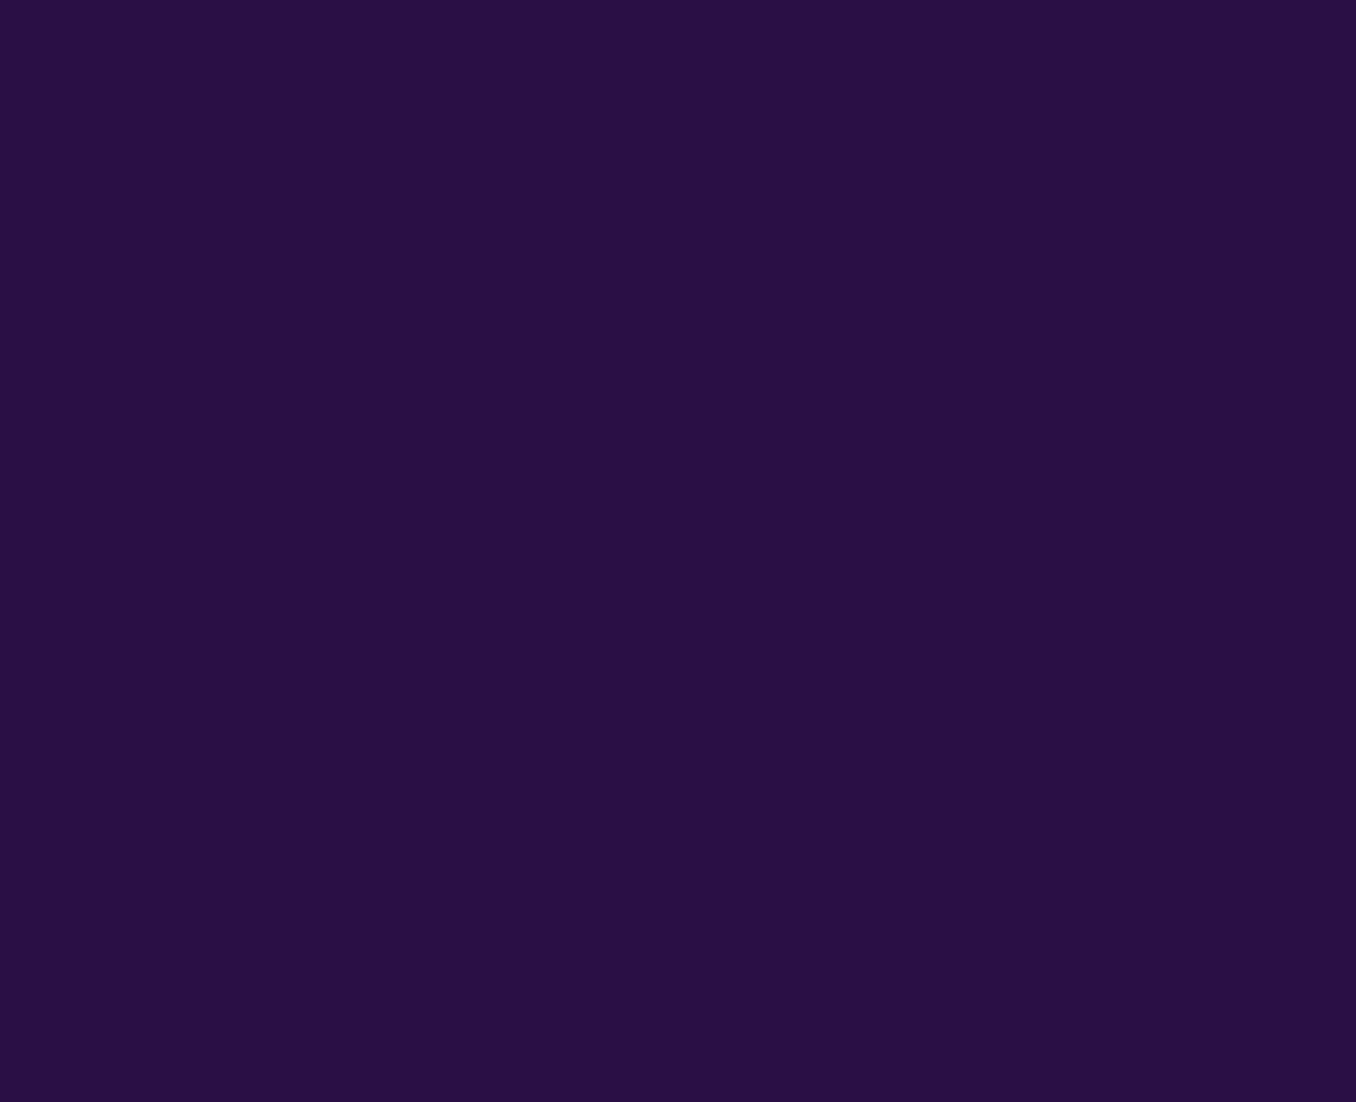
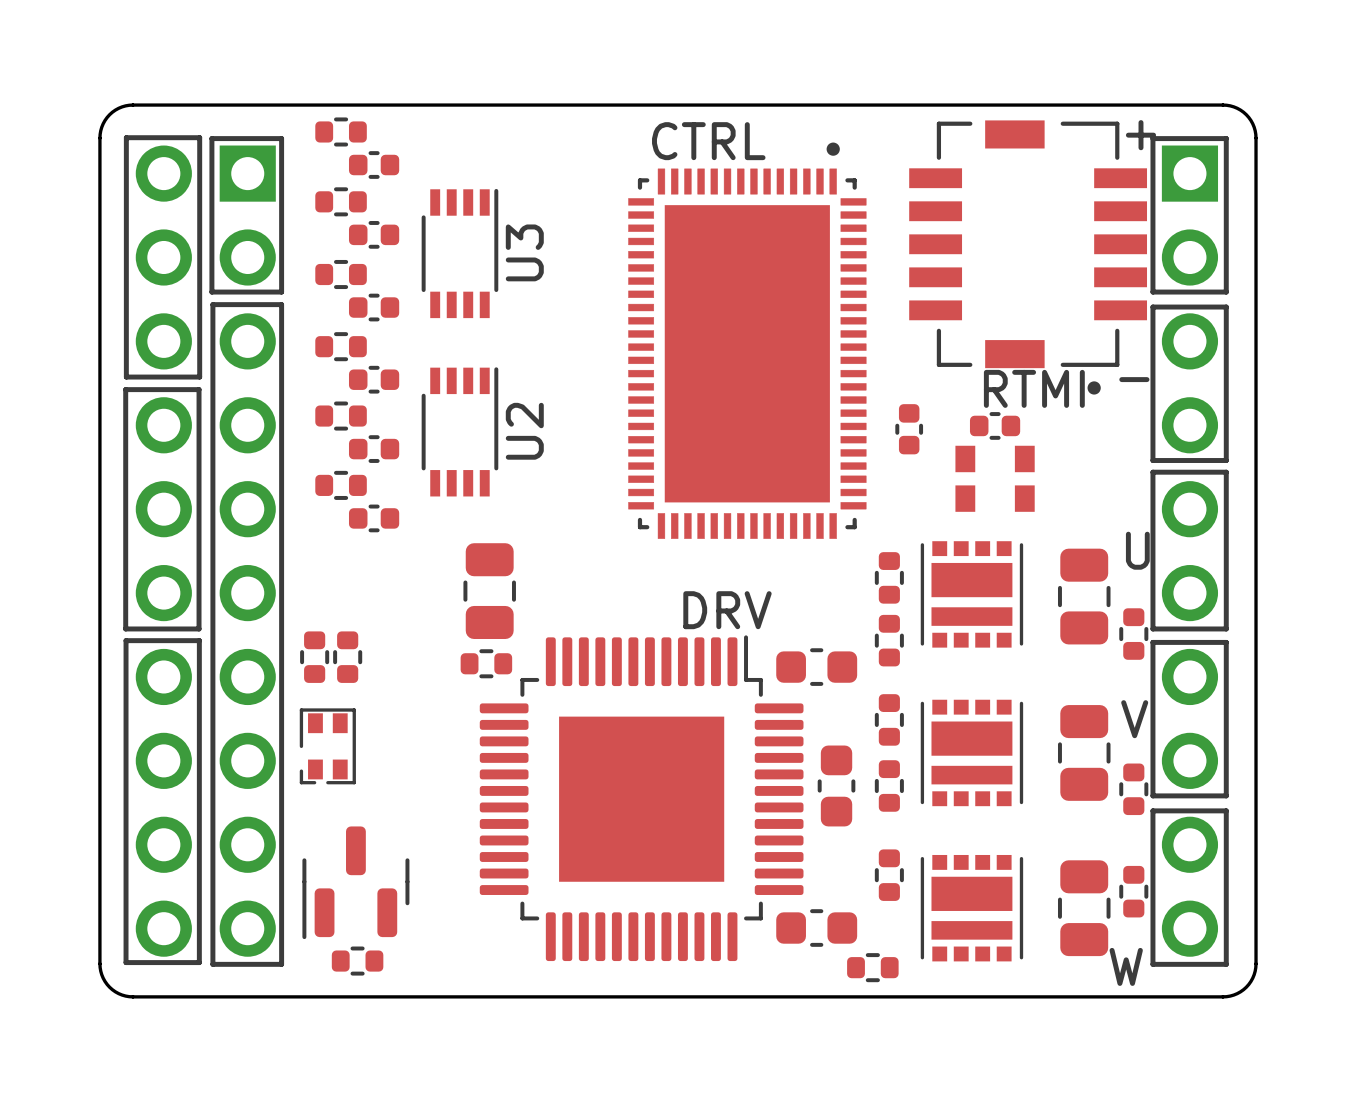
board edge: none -> (132, 105) (1222, 105) (1233, 106) (1243, 112) (1252, 123) (1256, 138) (1256, 963) (1254, 974) (1248, 984) (1237, 993) (1222, 996) (132, 996) (122, 995) (112, 989) (103, 978) (99, 963) (99, 138) (103, 123) (109, 114) (118, 108) (132, 105)
part: none -> (341, 131)
text: none -> + (1140, 135)
line: none -> (126, 137) (199, 137) (199, 377) (126, 377) (126, 137)
line: none -> (211, 138) (281, 138) (281, 292) (211, 292) (211, 138)
line: none -> (1152, 138) (1152, 292) (1226, 292) (1226, 138) (1152, 138)
text: none -> CTRL (708, 141)
part: none -> (374, 165)
part: none -> (341, 201)
part: none -> (374, 234)
U3: none -> (459, 253)
part: none -> (1028, 257)
part: none -> (341, 274)
line: none -> (212, 304) (281, 304) (281, 964) (212, 964) (212, 304)
part: none -> (374, 307)
line: none -> (1152, 307) (1152, 460) (1226, 460) (1226, 307) (1152, 307)
part: none -> (747, 340)
part: none -> (341, 346)
part: none -> (374, 379)
text: none -> - (1134, 379)
text: none -> RTMI (1034, 388)
line: none -> (125, 389) (199, 389) (199, 628) (125, 628) (125, 389)
part: none -> (341, 416)
part: none -> (995, 425)
part: none -> (909, 429)
U2: none -> (459, 431)
part: none -> (374, 449)
line: none -> (1152, 472) (1226, 472) (1226, 628) (1152, 628) (1152, 472)
part: none -> (995, 478)
part: none -> (341, 485)
part: none -> (374, 518)
part: none -> (205, 551)
text: none -> U (1137, 550)
part: none -> (1189, 551)
part: none -> (889, 577)
part: none -> (489, 591)
part: none -> (971, 594)
part: none -> (1084, 596)
text: none -> DRV (727, 610)
part: none -> (1133, 634)
line: none -> (126, 640) (199, 640) (199, 962) (126, 962) (126, 640)
part: none -> (889, 640)
line: none -> (1152, 642) (1152, 795) (1226, 795) (1226, 642) (1152, 642)
part: none -> (314, 657)
part: none -> (347, 657)
part: none -> (486, 663)
part: none -> (816, 667)
part: none -> (889, 719)
text: none -> V (1134, 719)
part: none -> (327, 746)
part: none -> (971, 752)
part: none -> (1084, 752)
part: none -> (836, 785)
part: none -> (889, 785)
part: none -> (1133, 789)
part: none -> (641, 798)
line: none -> (1152, 810) (1152, 964) (1226, 964) (1226, 810) (1152, 810)
part: none -> (889, 875)
part: none -> (355, 882)
part: none -> (1133, 891)
part: none -> (971, 908)
part: none -> (1084, 908)
part: none -> (816, 928)
part: none -> (357, 961)
text: none -> W (1126, 966)
part: none -> (872, 967)

